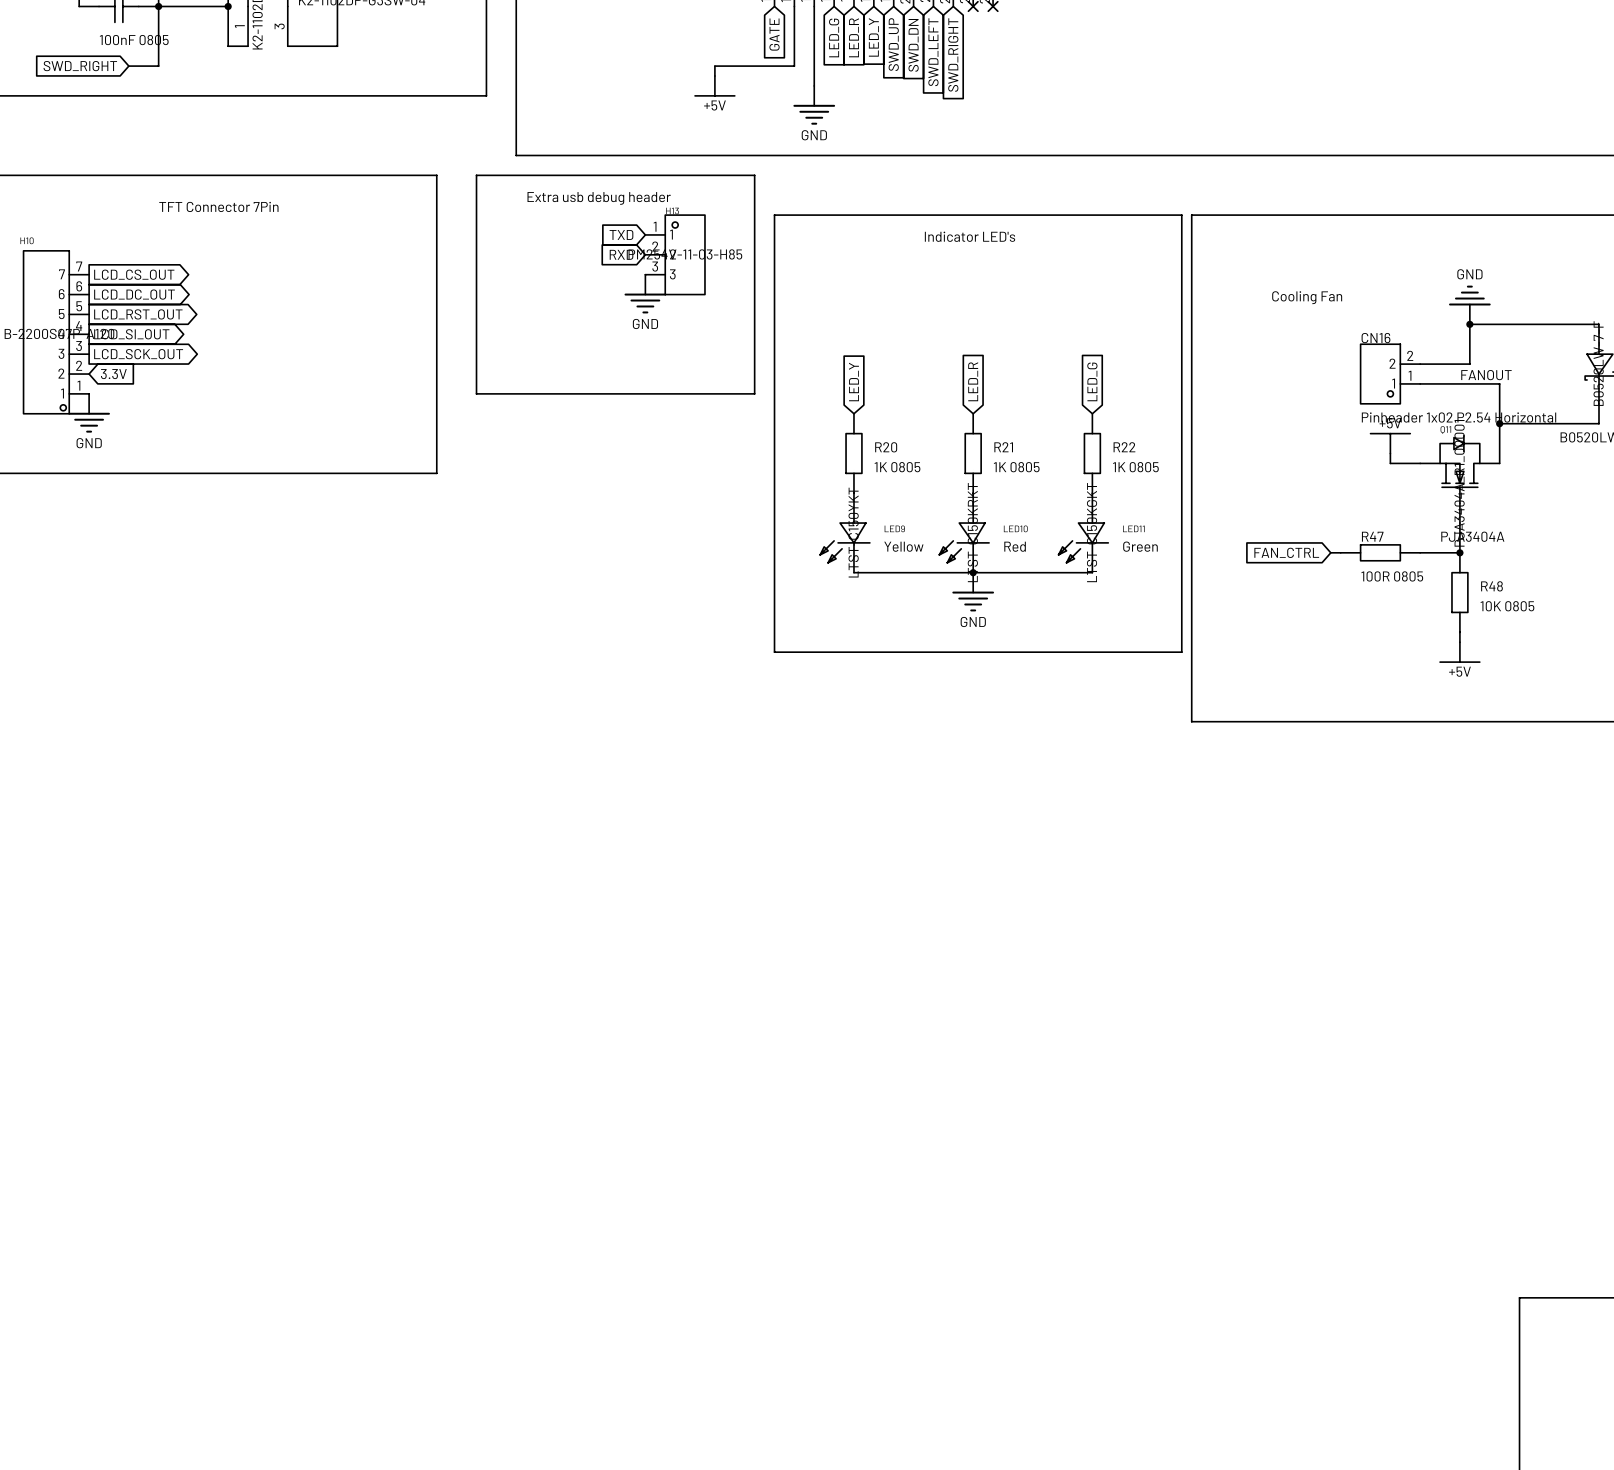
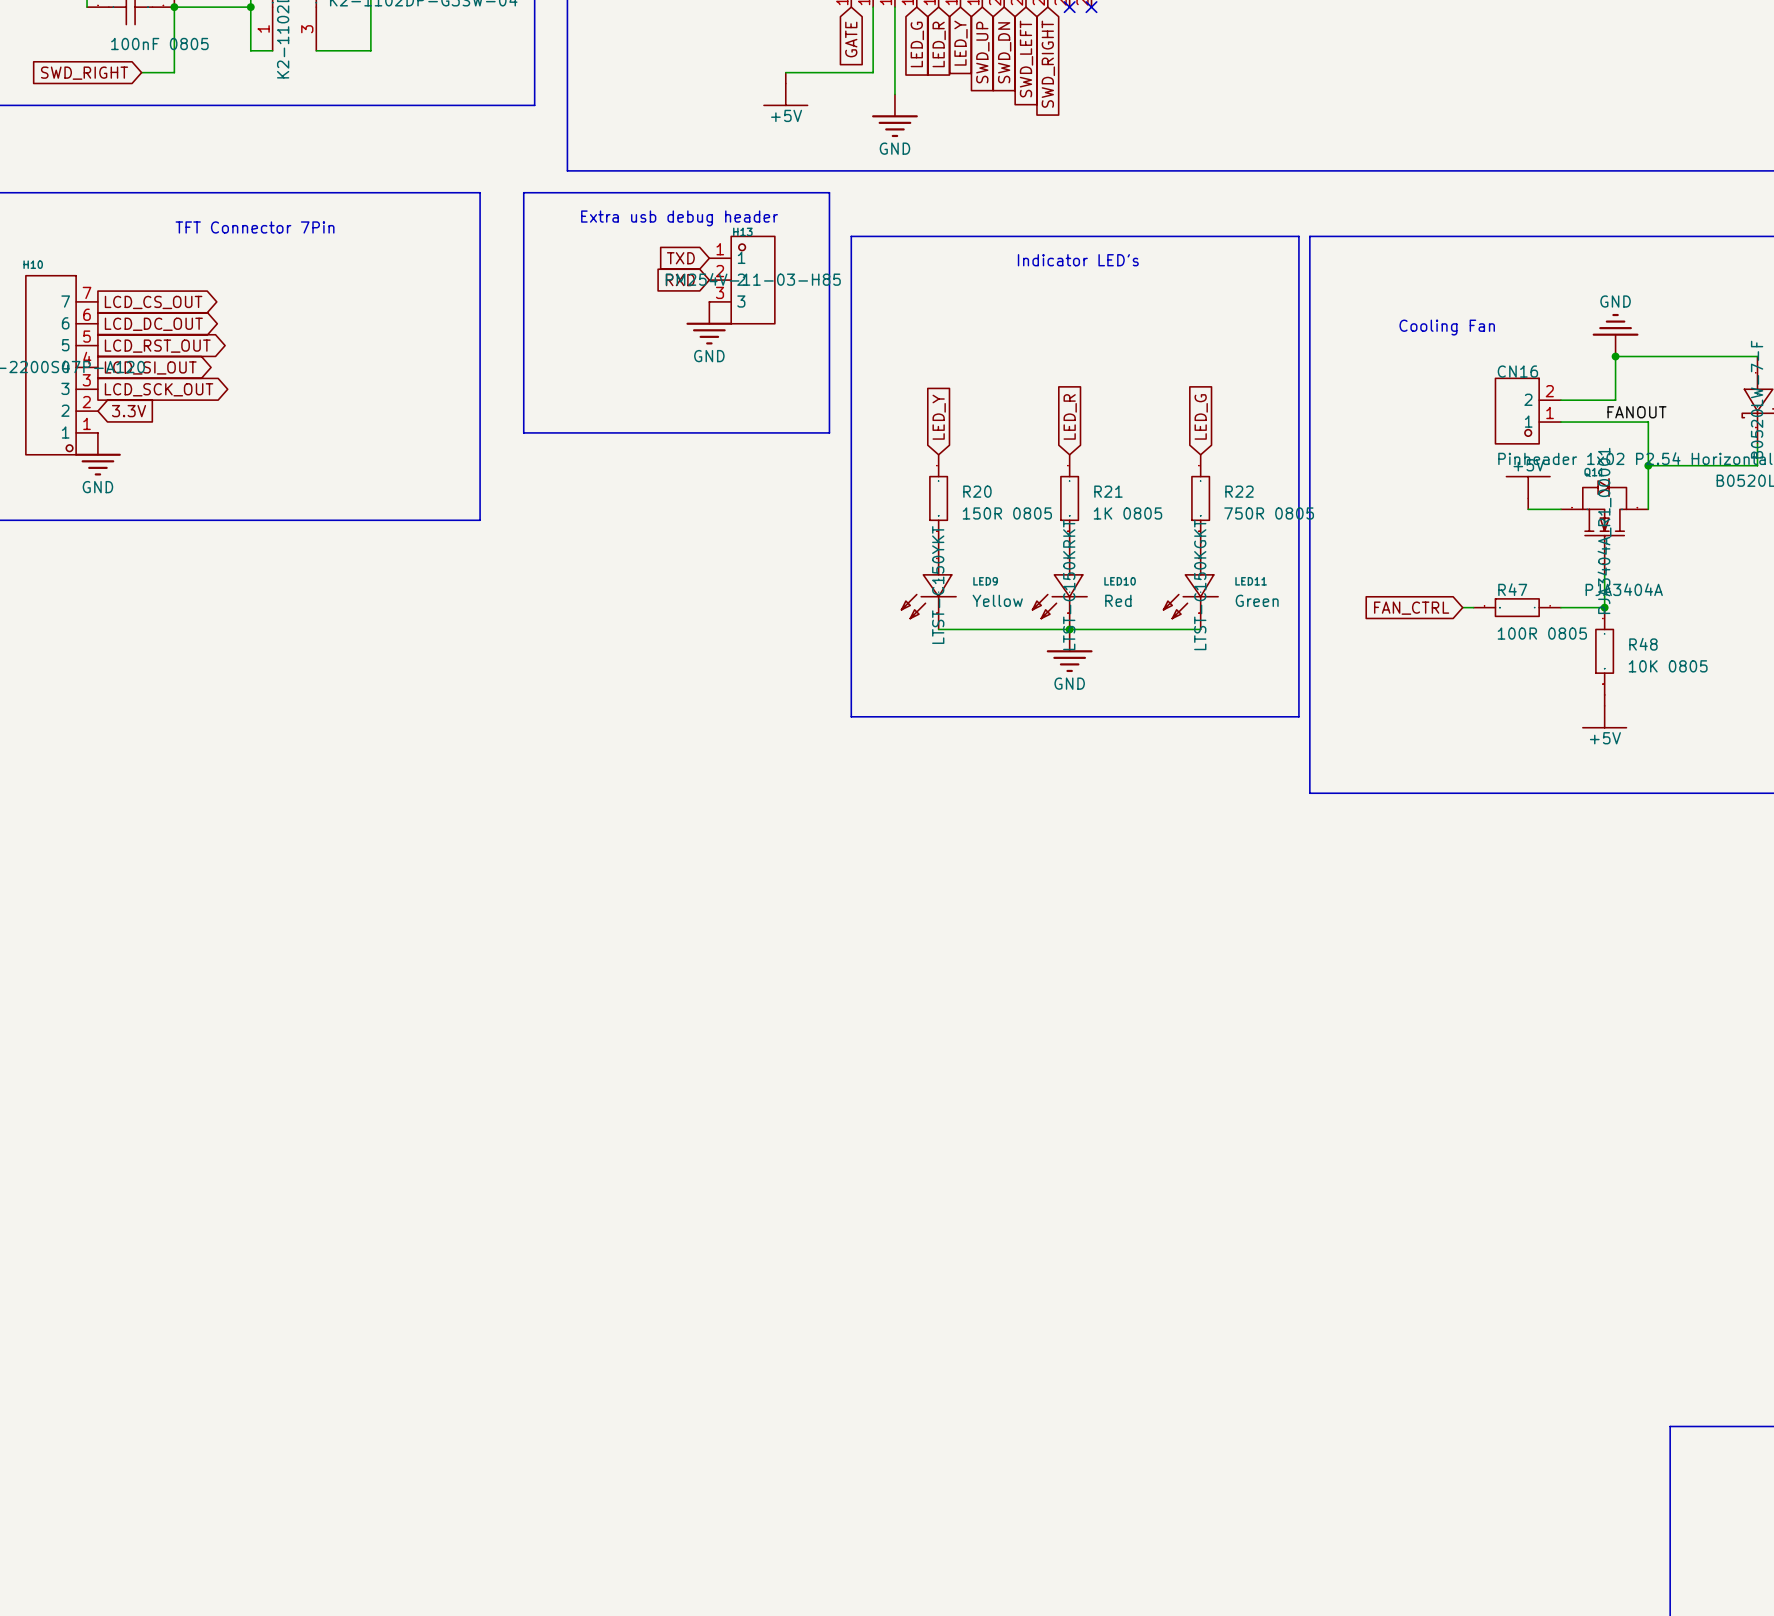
R20 value: 1K 0805 (897, 467) -> 150R 0805 (1007, 513)
R22 value: 1K 0805 (1135, 467) -> 750R 0805 (1269, 513)

